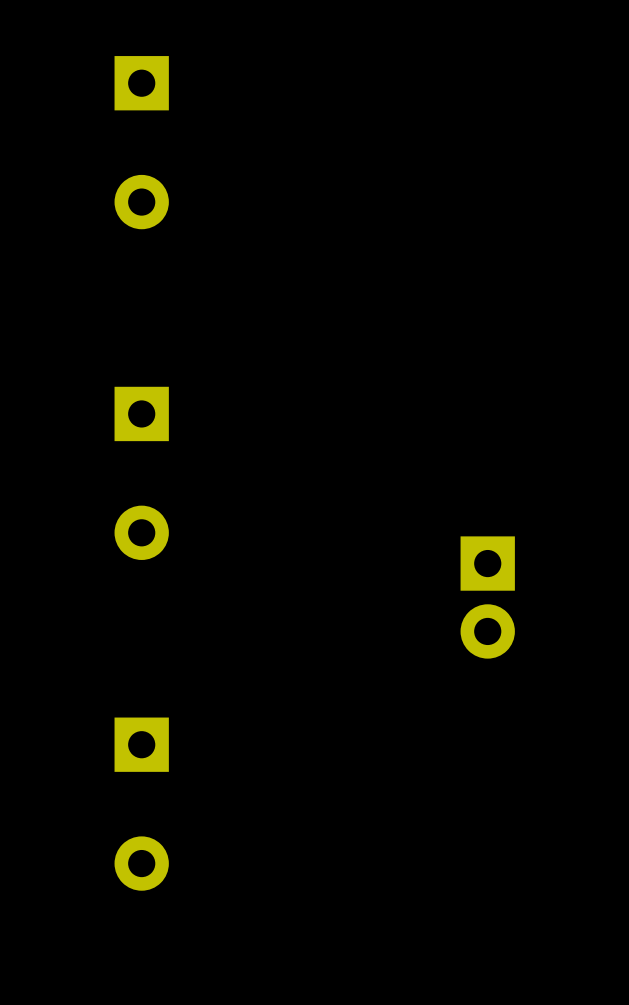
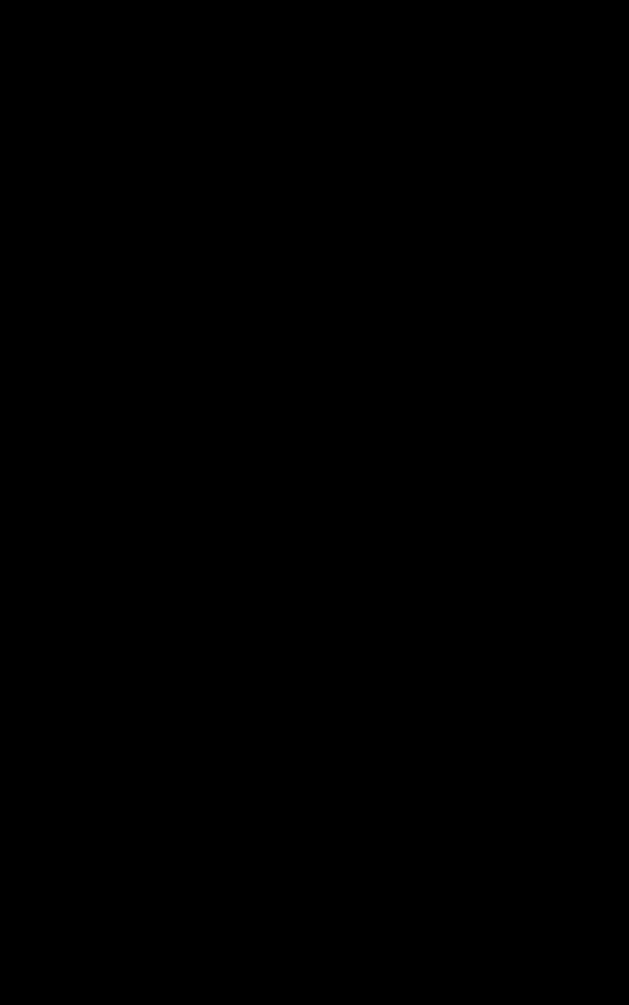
part: (141, 142) -> none
part: (141, 473) -> none
part: (487, 597) -> none
part: (141, 804) -> none

